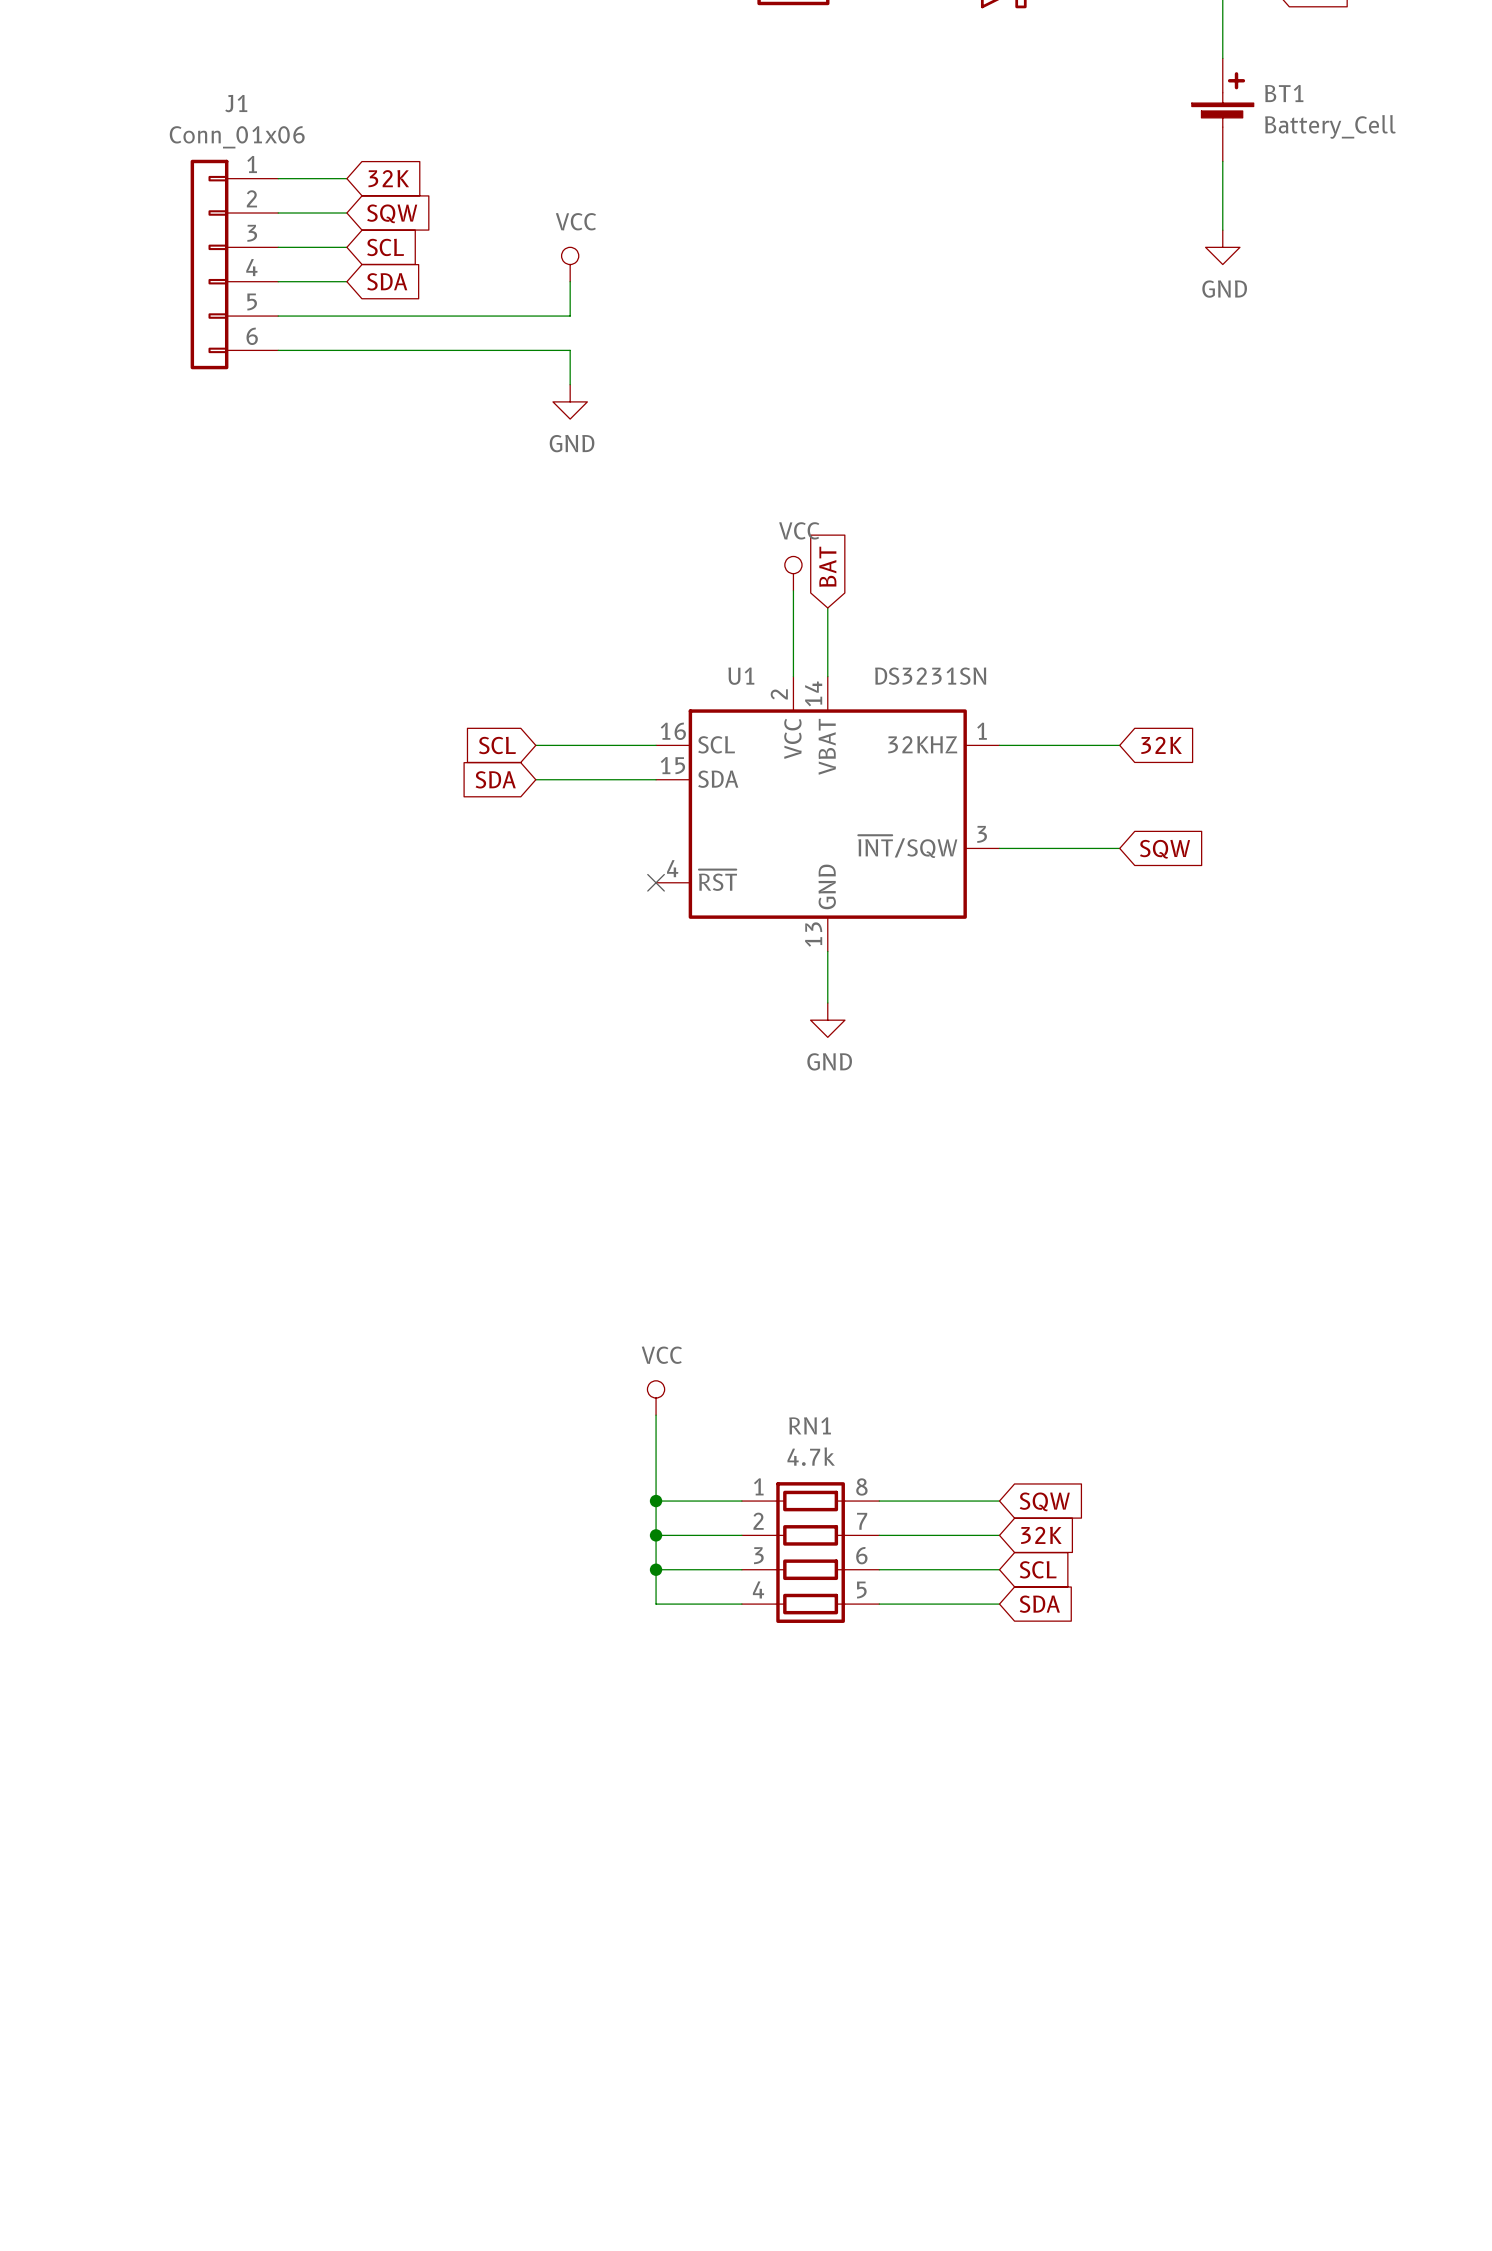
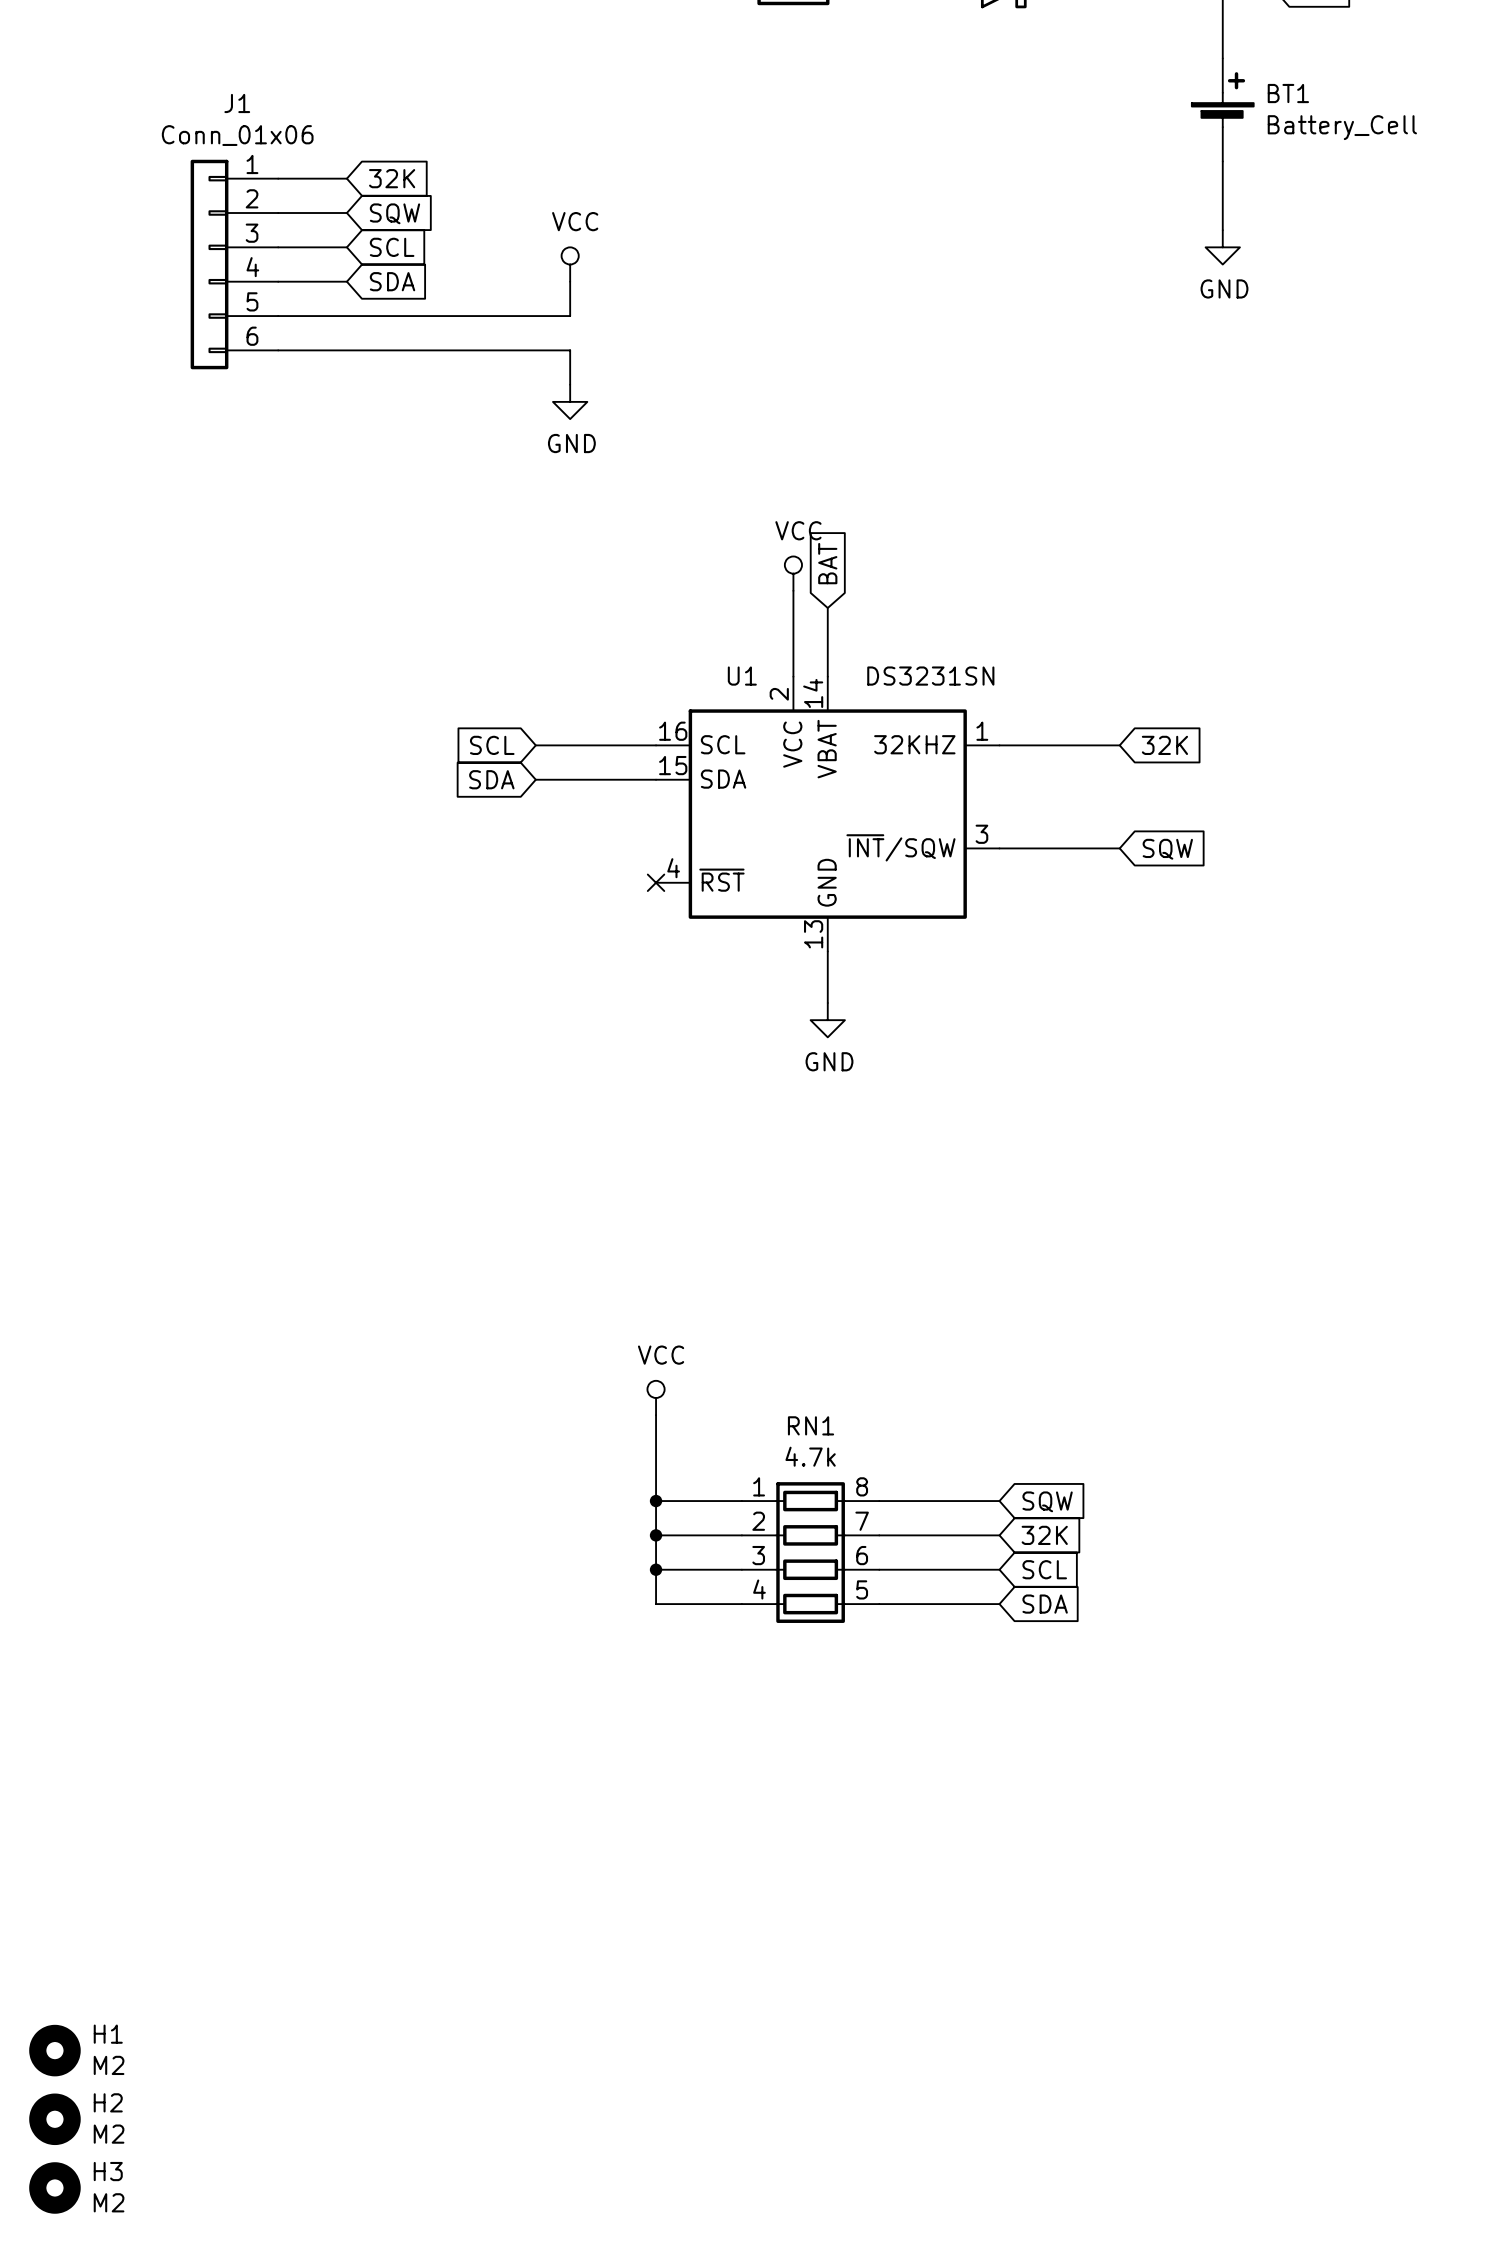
H1: none -> M2 (54, 2050)
H2: none -> M2 (54, 2119)
H3: none -> M2 (54, 2187)

